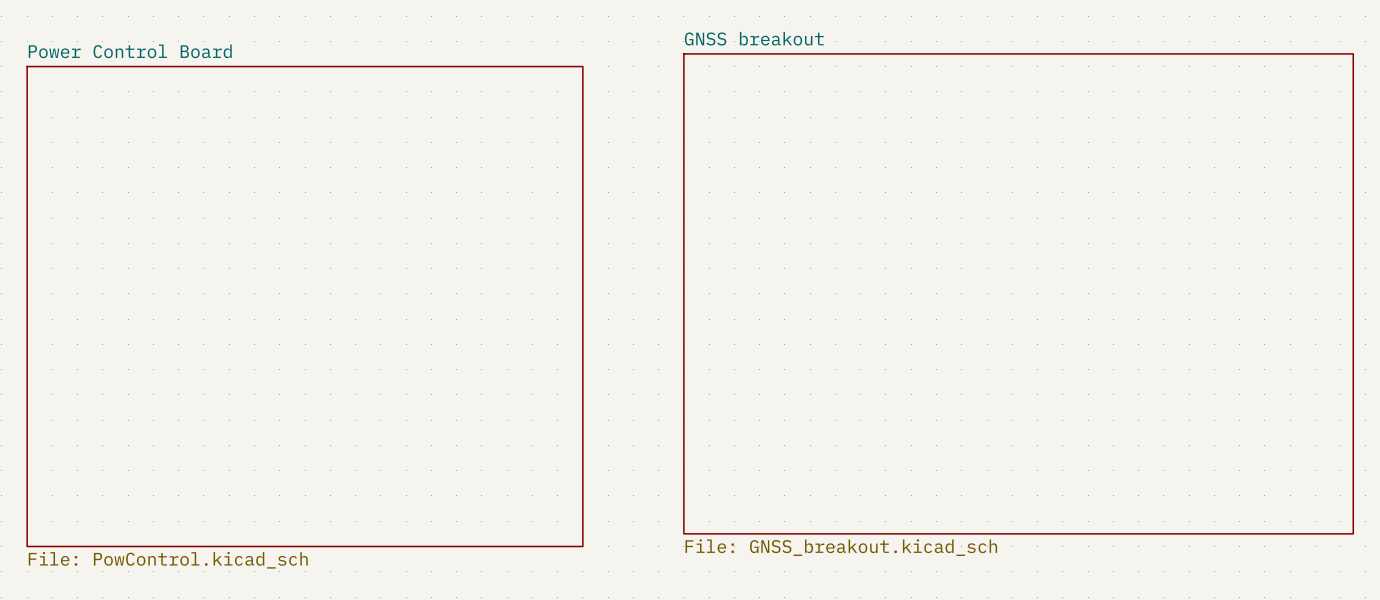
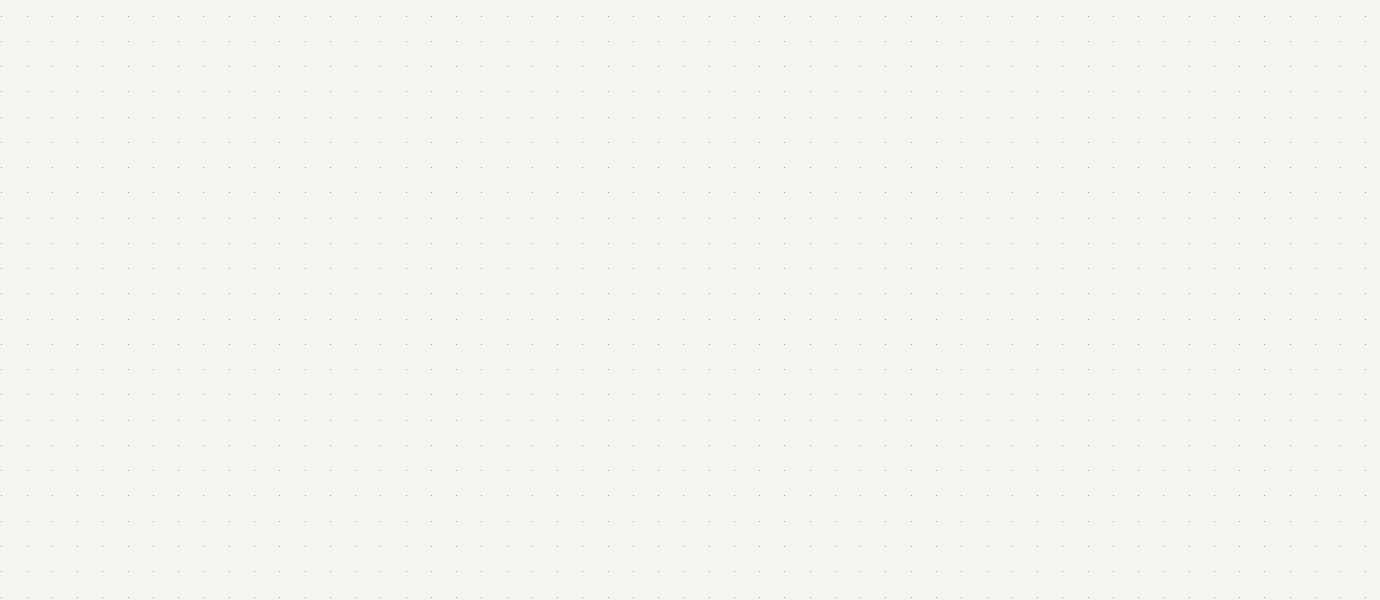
sheet GNSS breakout: File: GNSS_breakout.kicad_sch (1018, 293) -> none
sheet Power Control Board: File: PowControl.kicad_sch (305, 306) -> none

